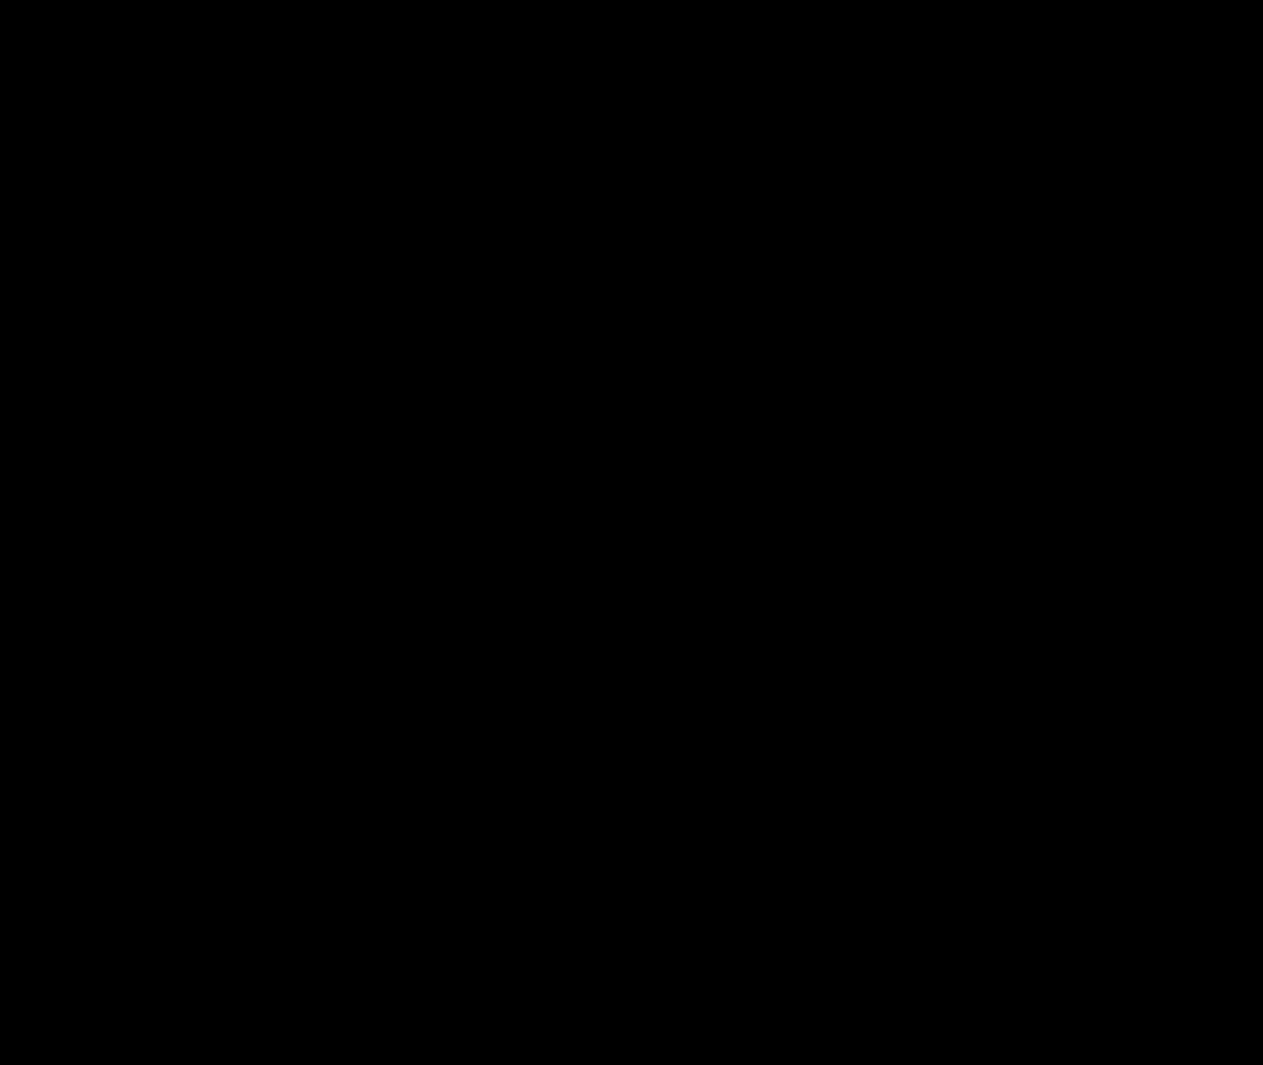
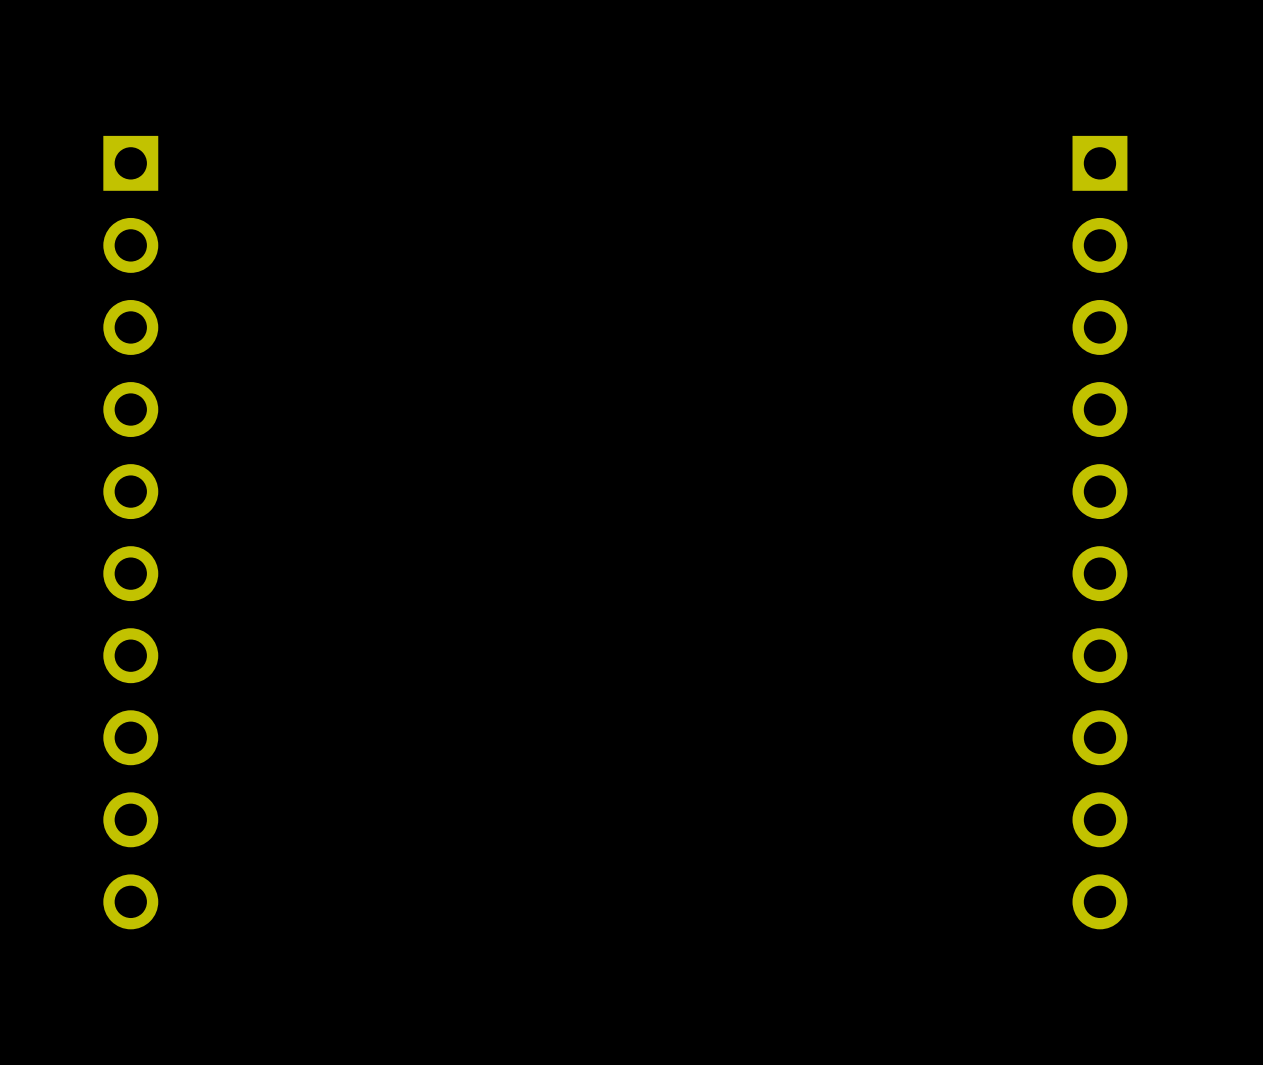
part: none -> (130, 532)
part: none -> (1099, 532)

